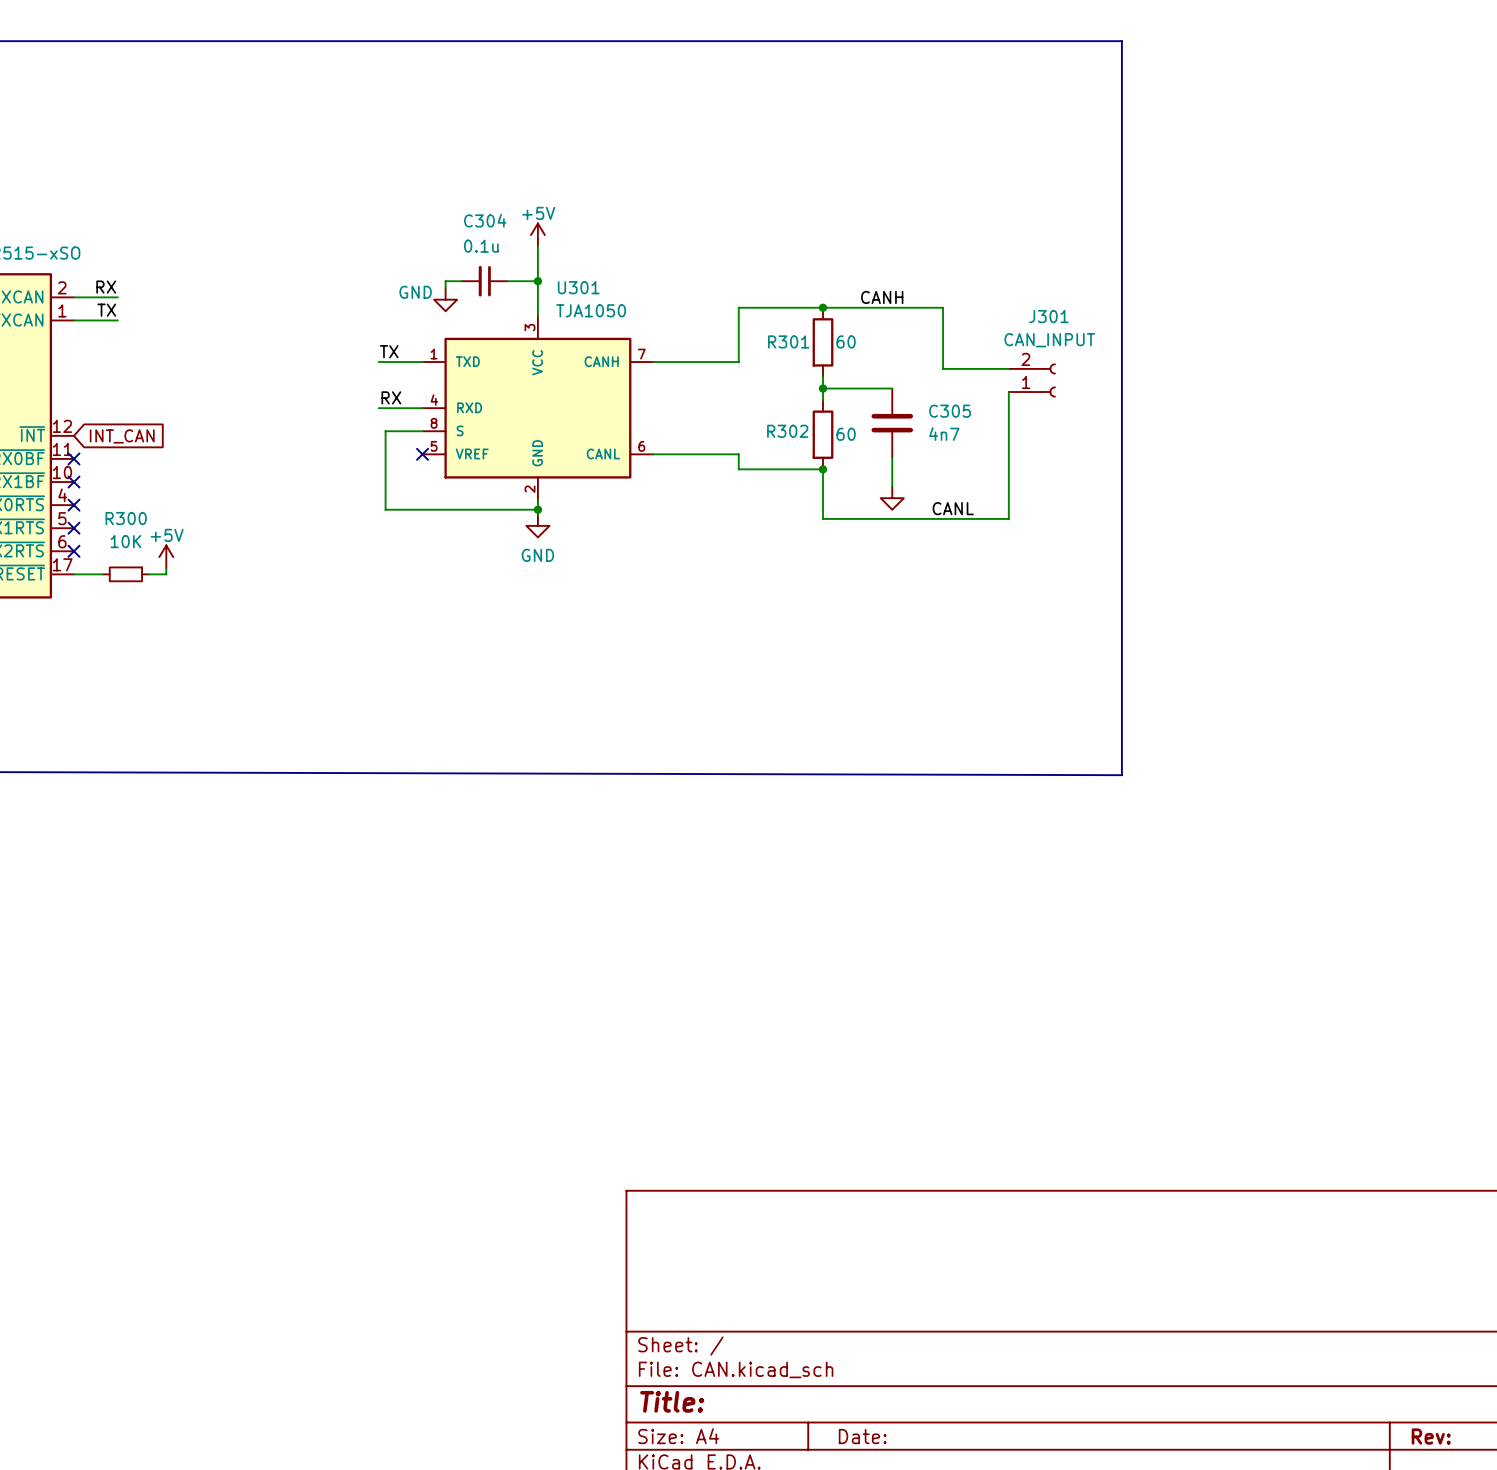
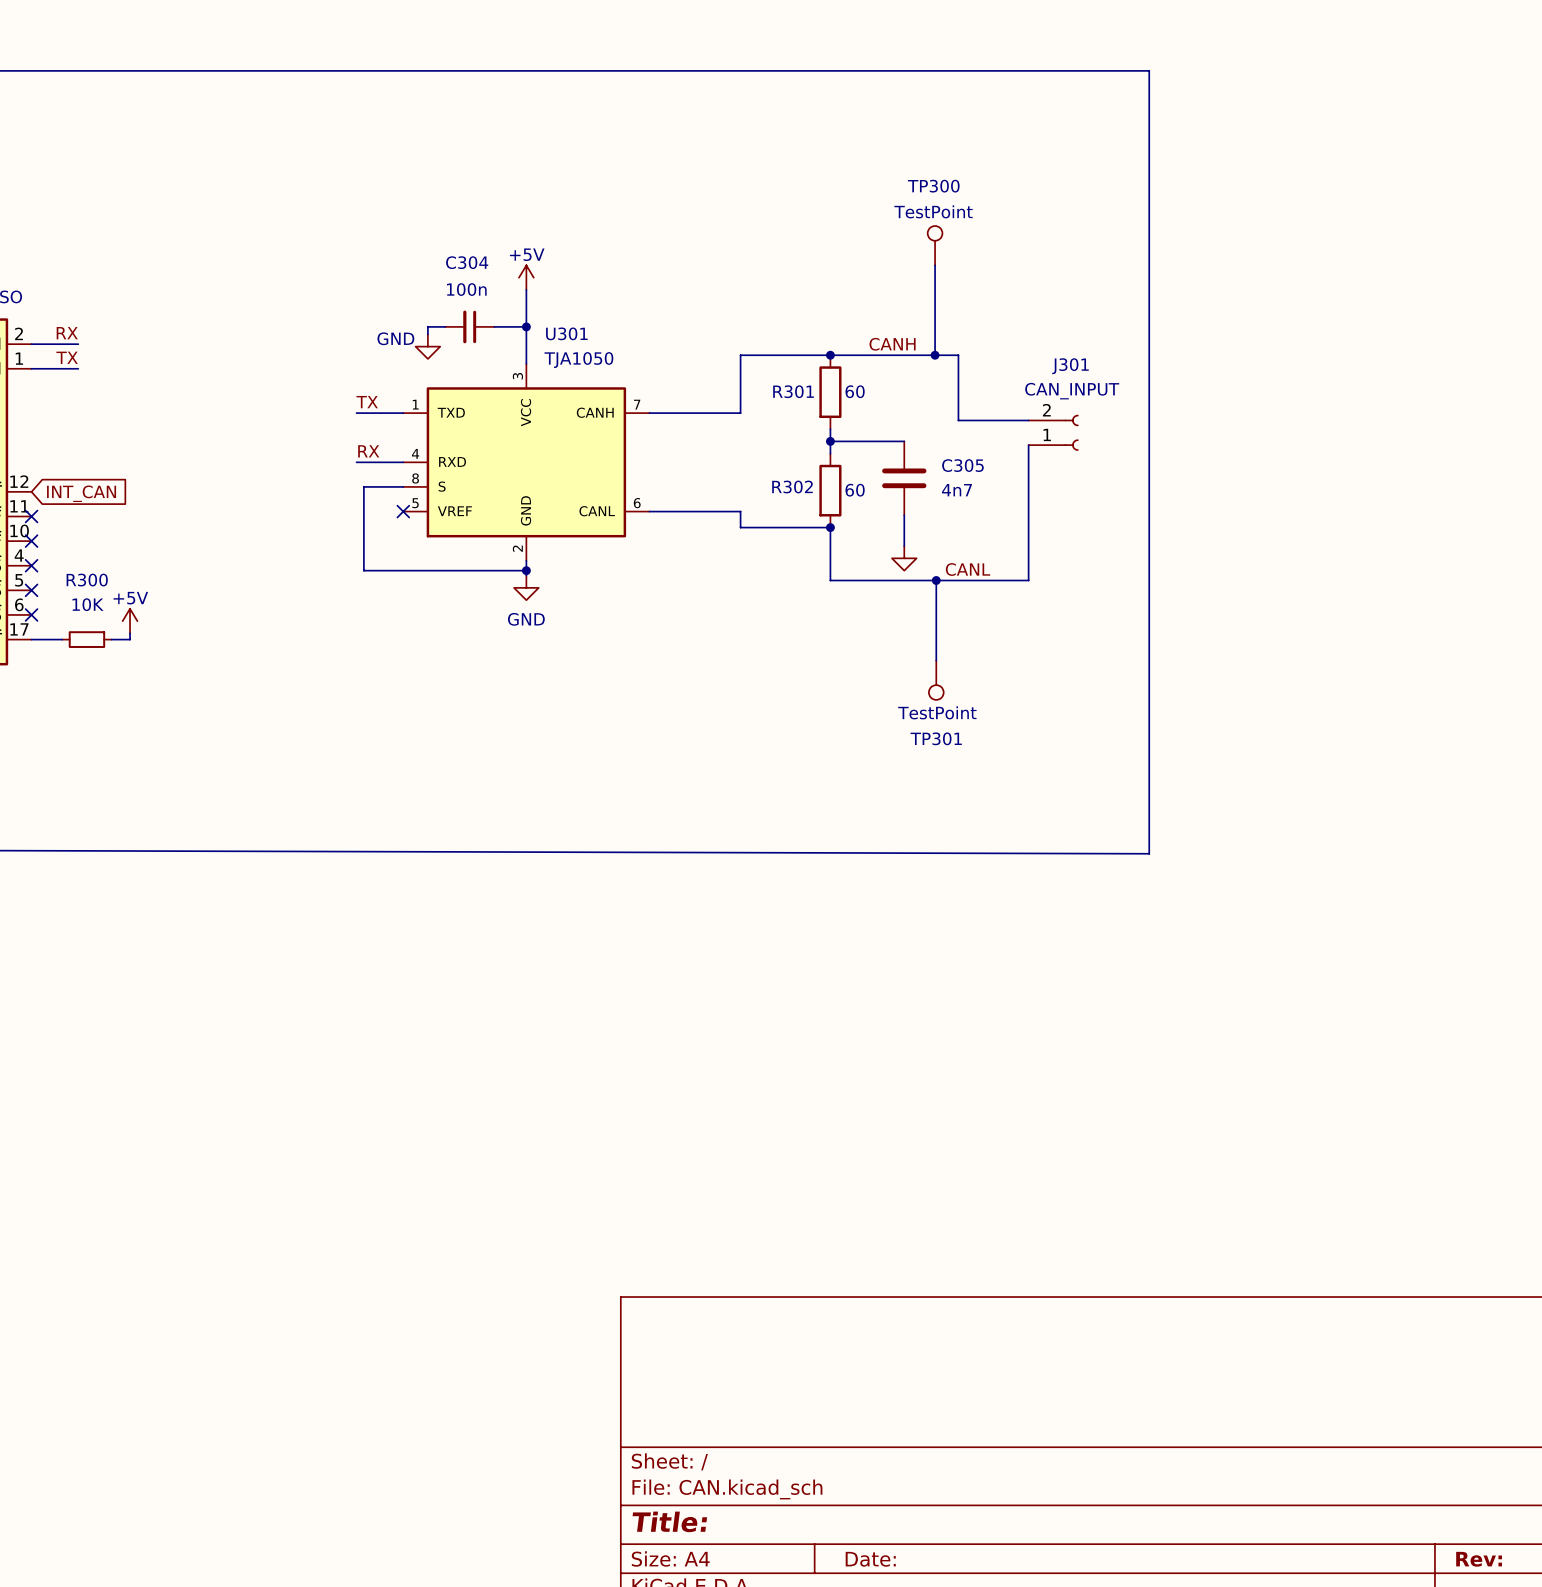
TP300: none -> TestPoint (935, 245)
wire: none -> (935, 265) (935, 355)
C304 value: 0.1u (481, 246) -> 100n (466, 289)
junction: none -> (935, 355)
wire: none -> (936, 580) (936, 660)
junction: none -> (936, 580)
TP301: none -> TestPoint (936, 680)

